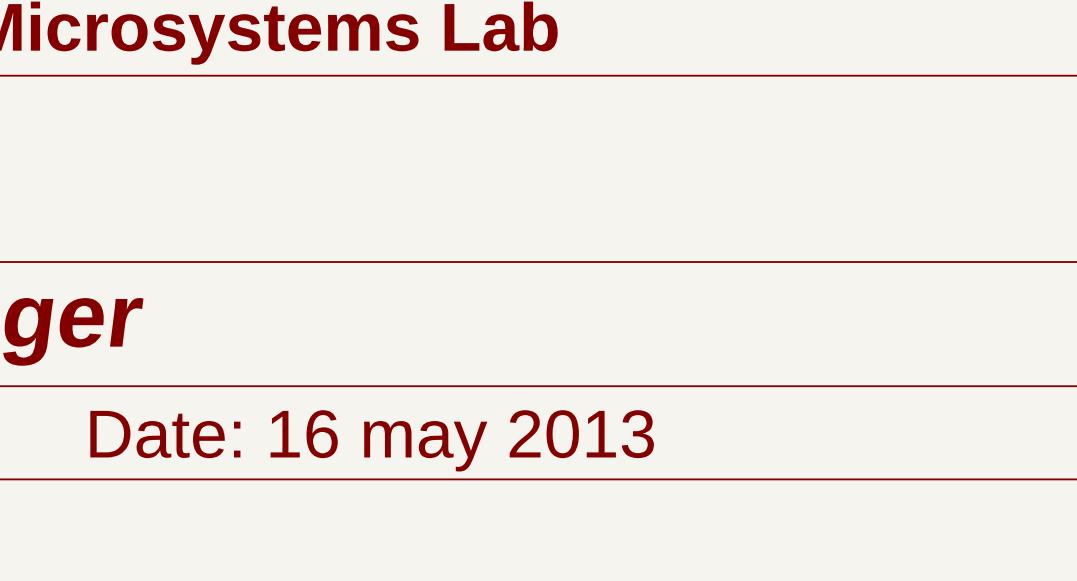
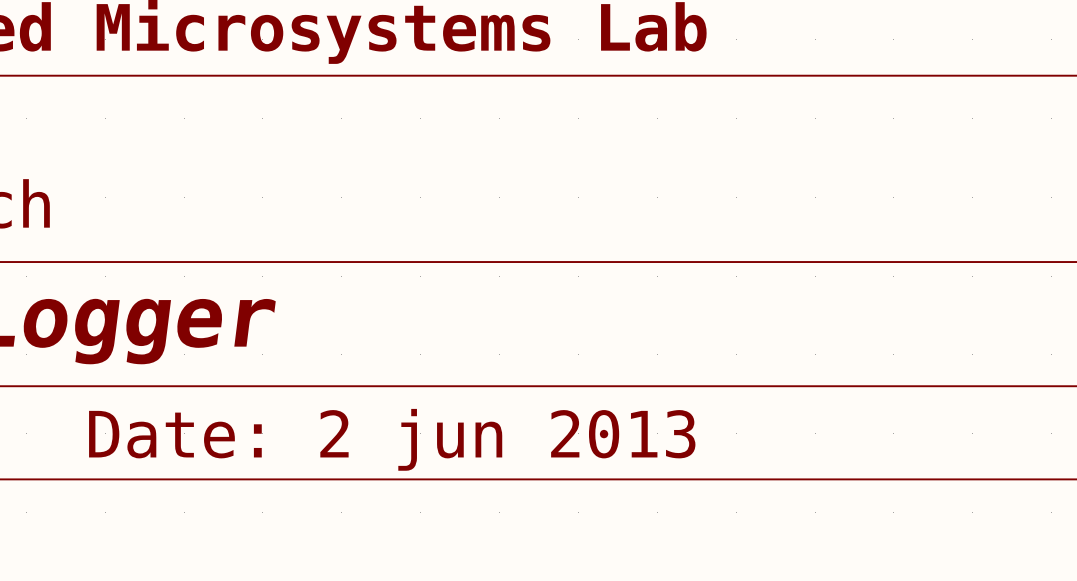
title block: Date: 16 may 2013 (372, 440) -> Date: 2 jun 2013 (392, 439)

